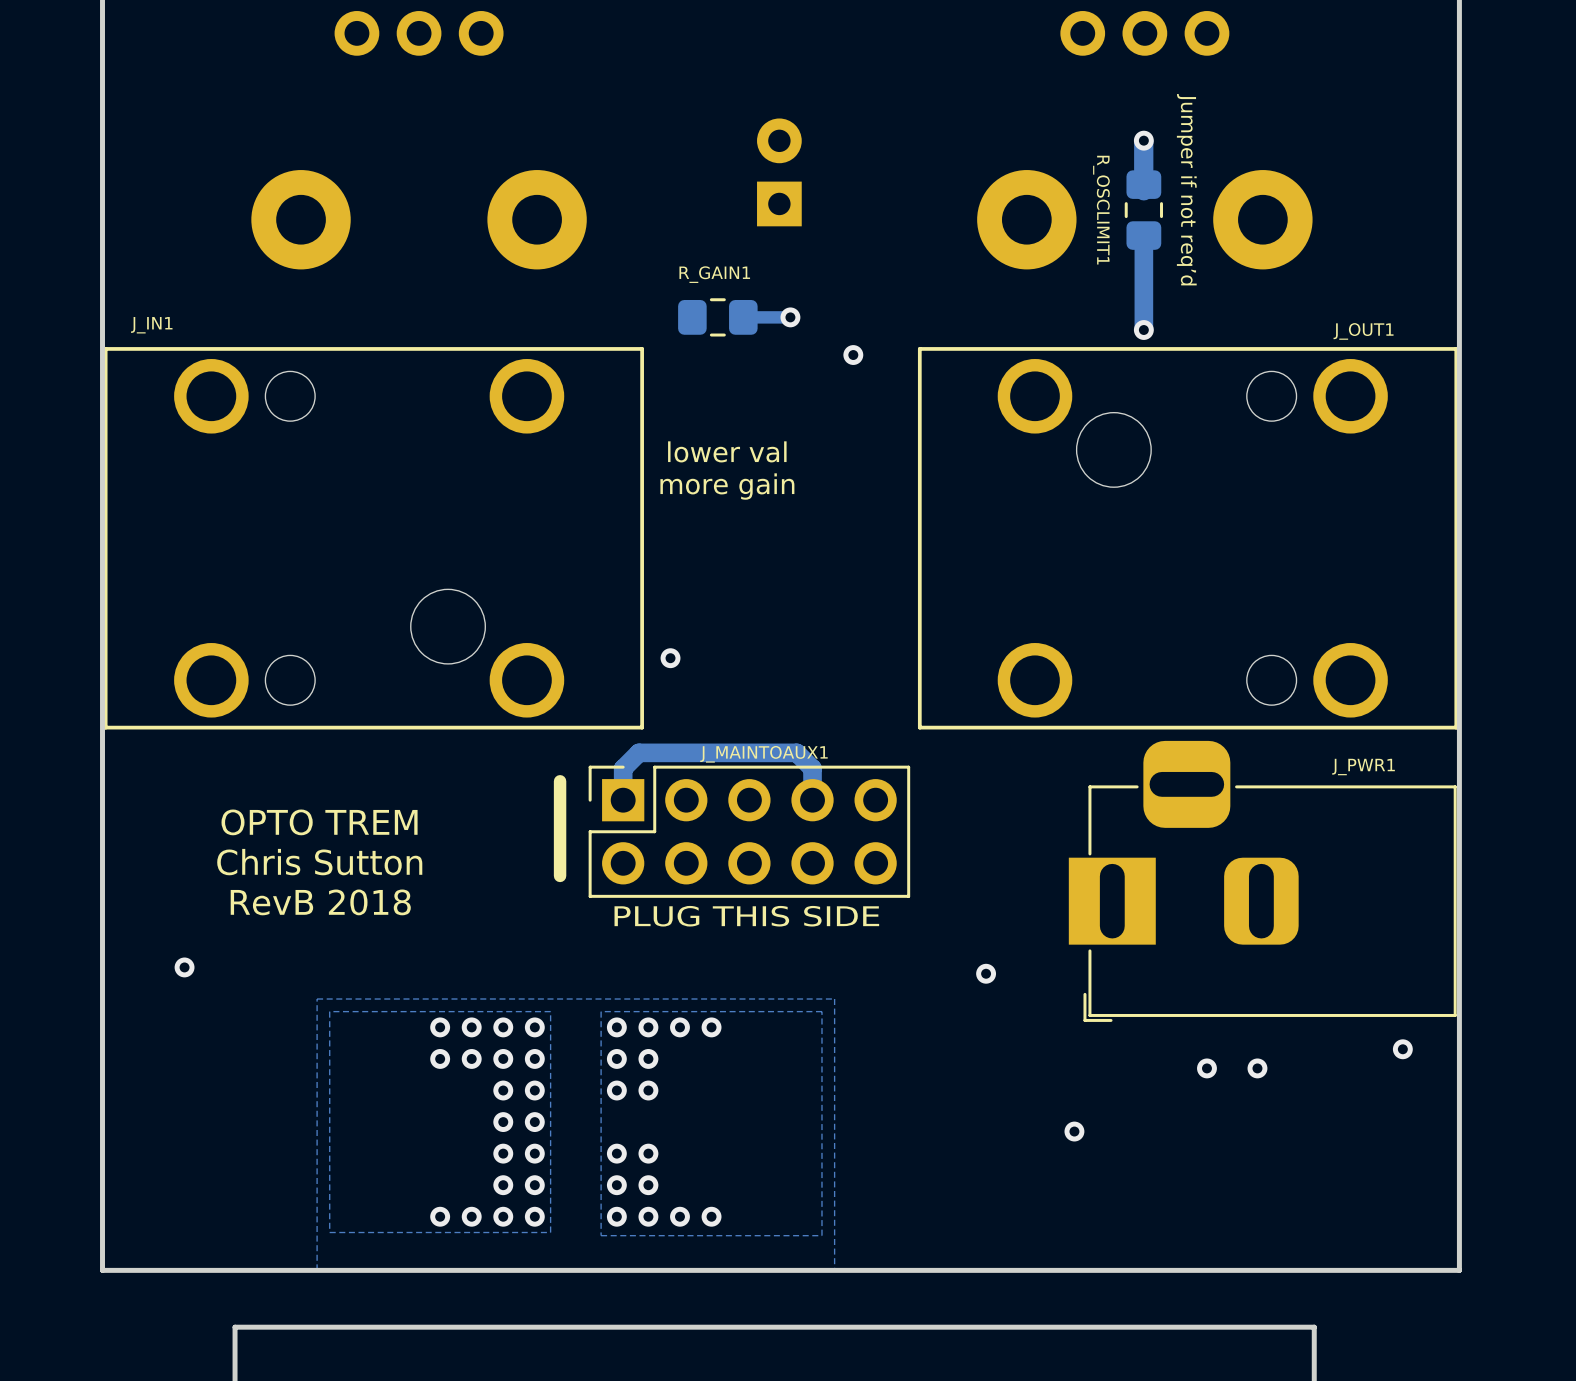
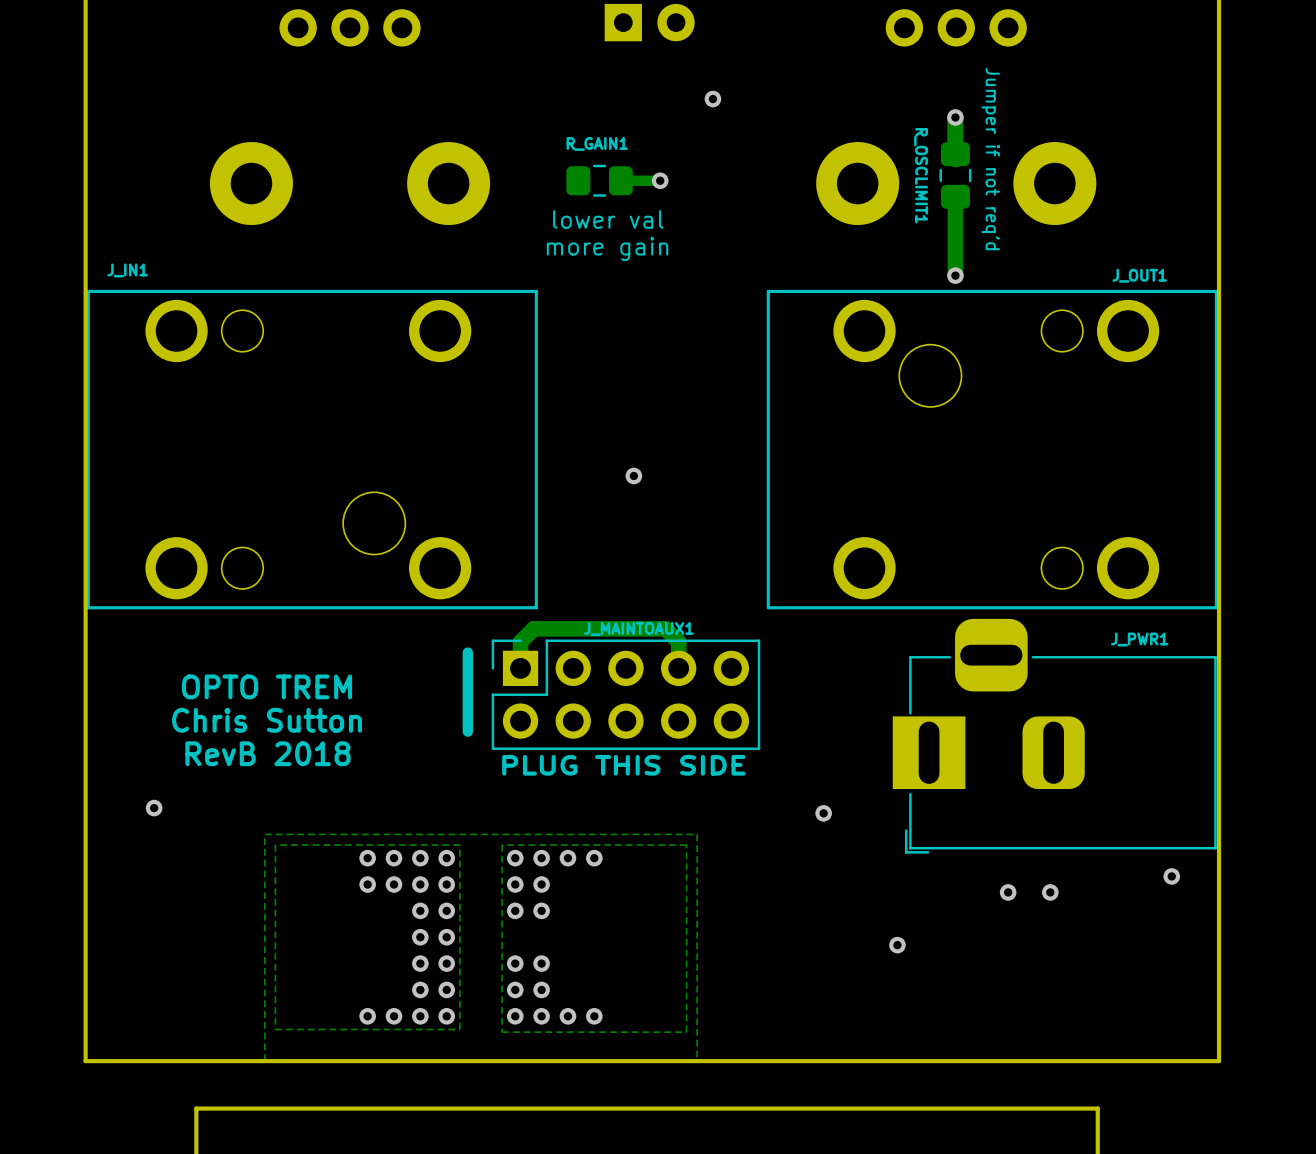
via: none -> (712, 99)
part rotation: 0° (779, 172) -> 90° clockwise (649, 22)
part position: (779, 172) -> (649, 22)
via: none -> (660, 180)
R_GAIN1 position: (717, 317) -> (599, 180)
track: (787, 317) (739, 317) -> (660, 180) (620, 180)
via: (790, 317) -> none
via: (853, 355) -> none
text position: lower val (727, 451) -> lower val (608, 219)
text position: more gain (727, 486) -> more gain (607, 248)
via: none -> (633, 475)
via: (670, 658) -> none

